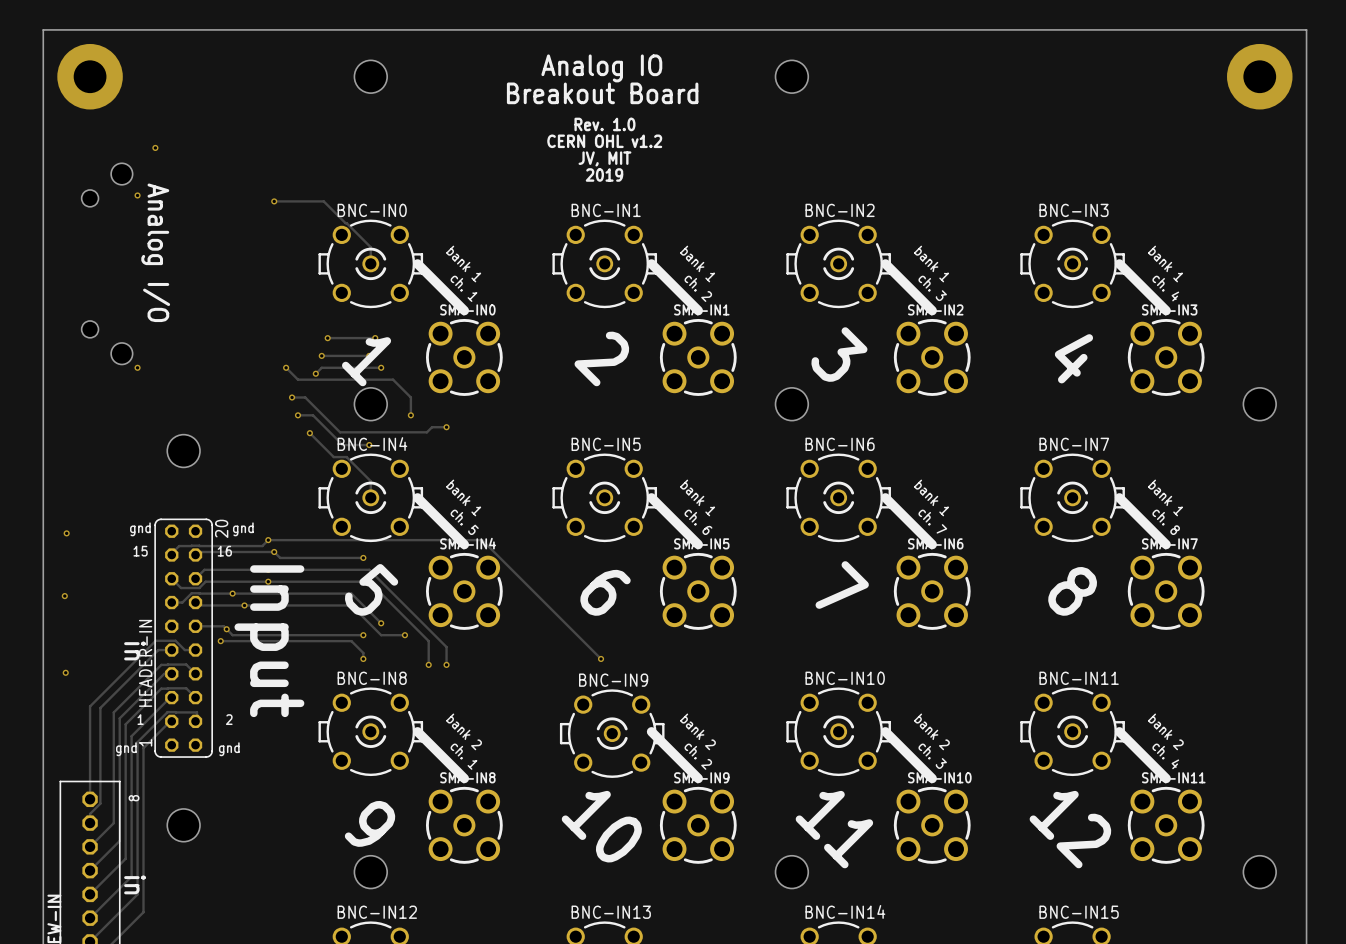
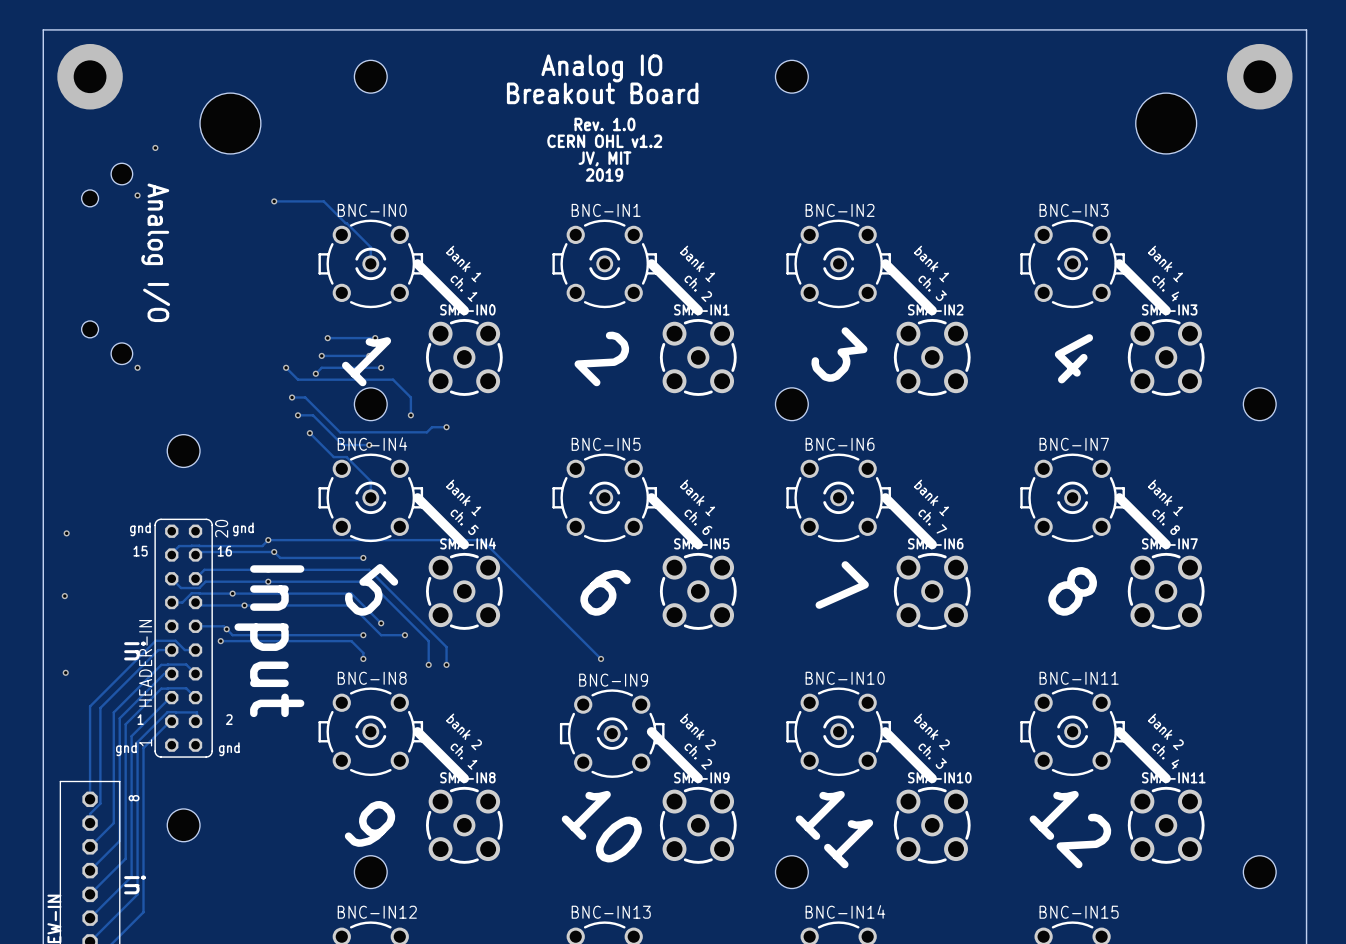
hole: none -> (230, 123)
hole: none -> (1166, 123)

